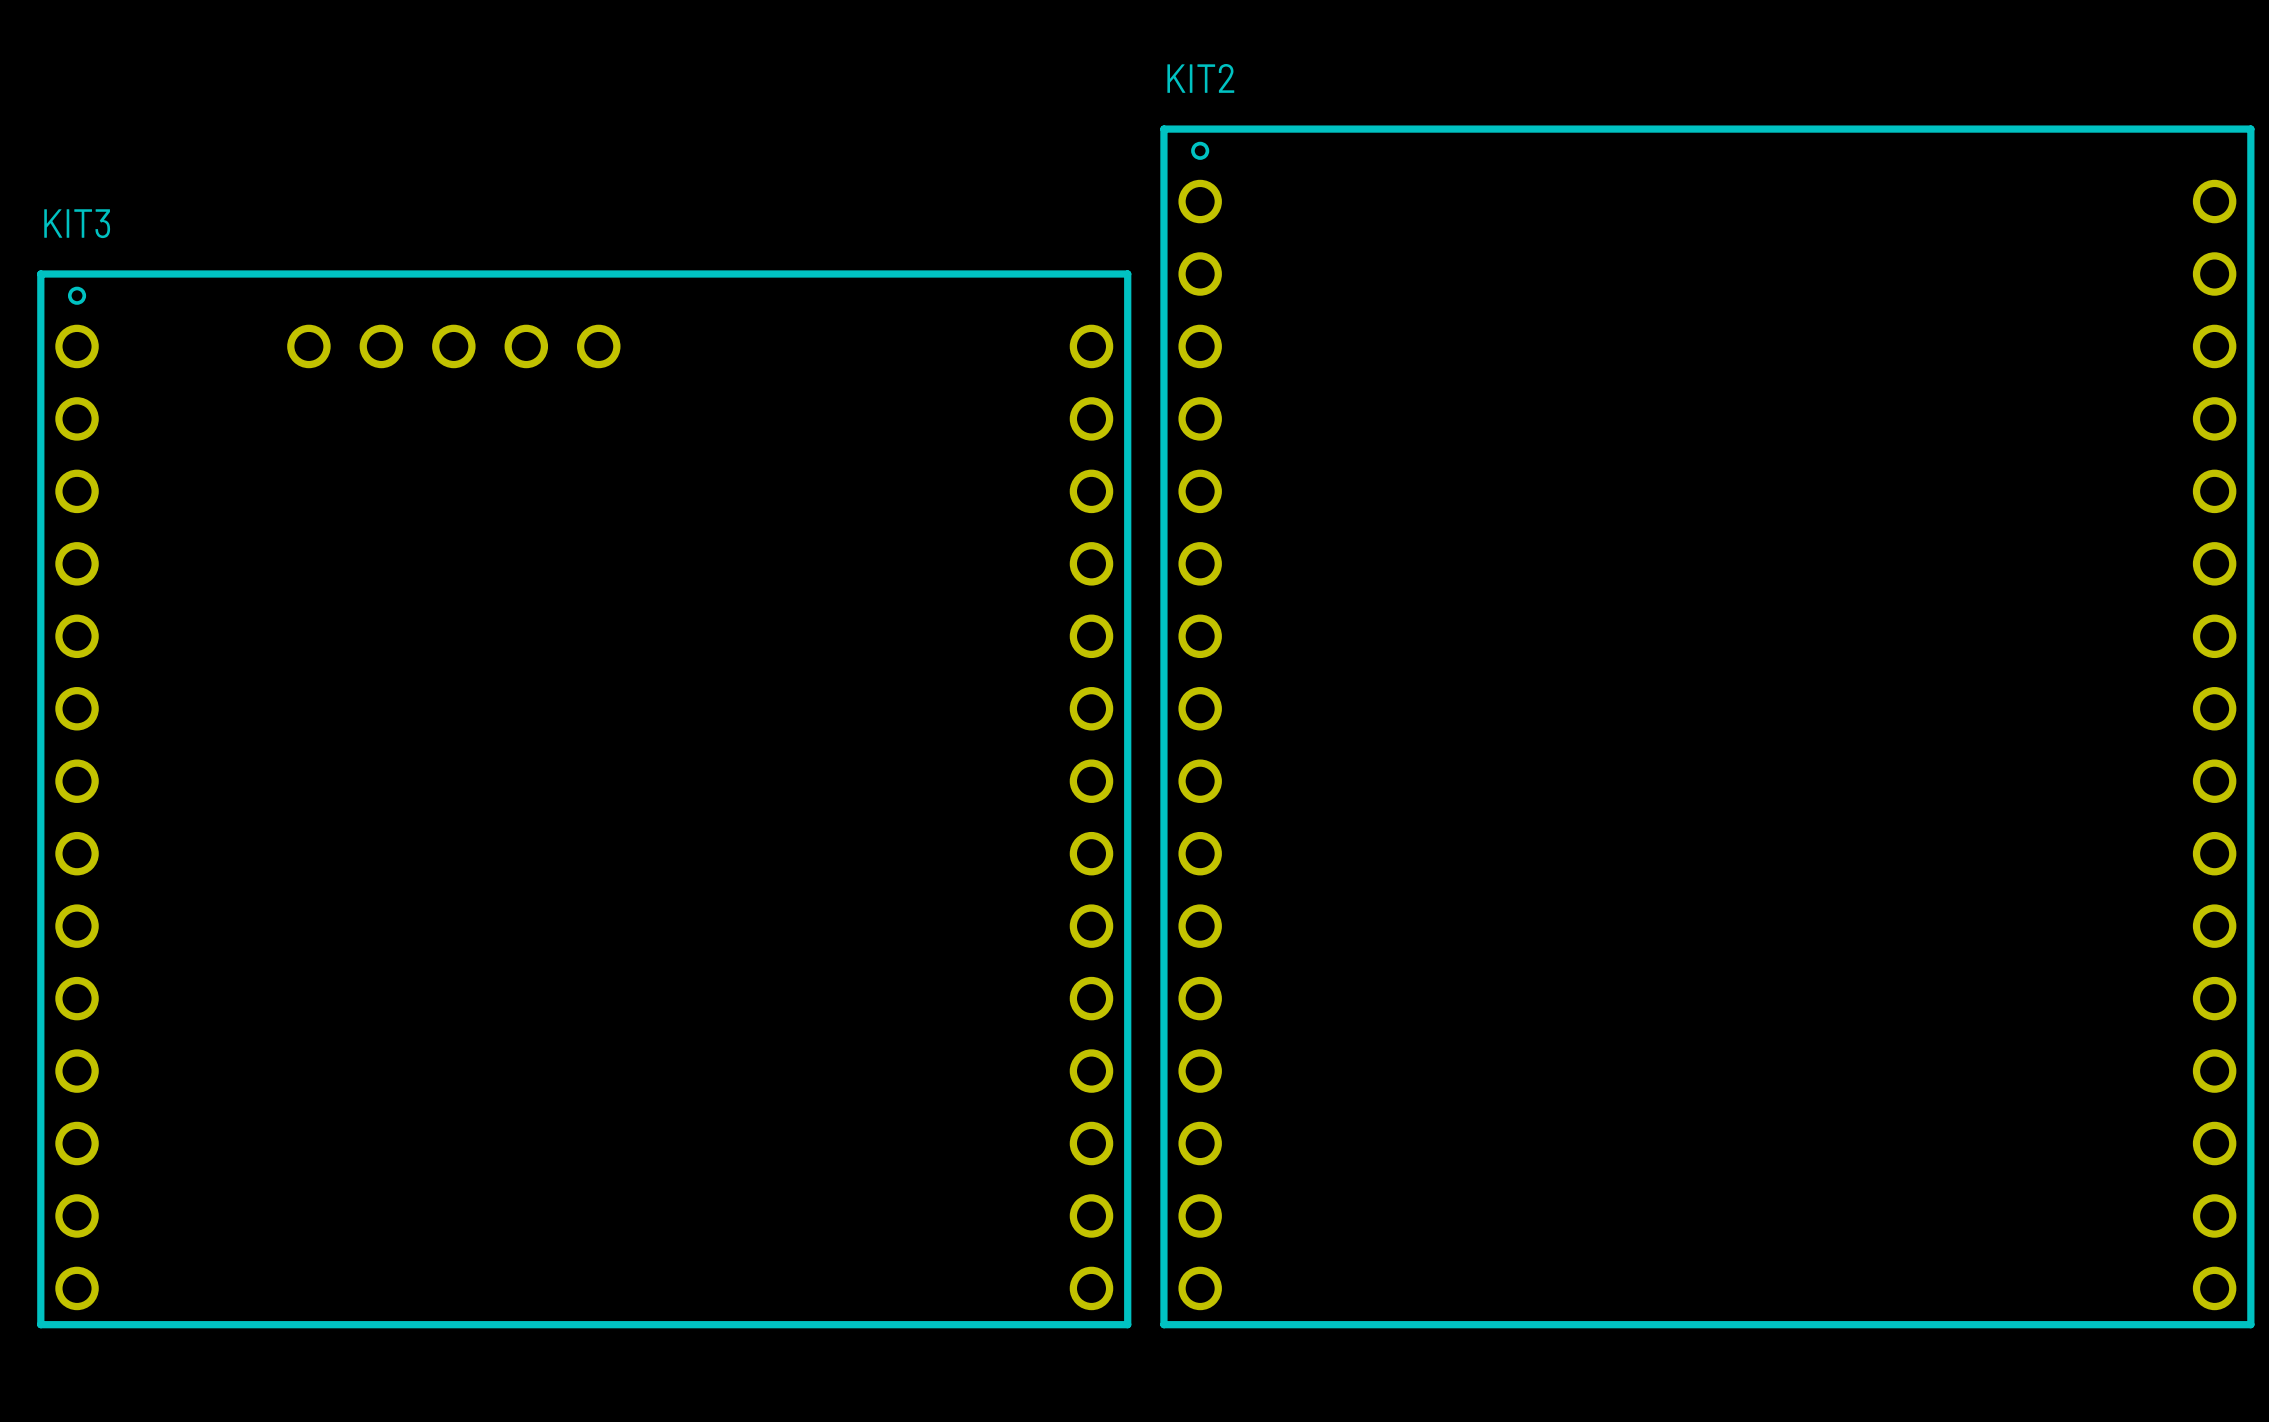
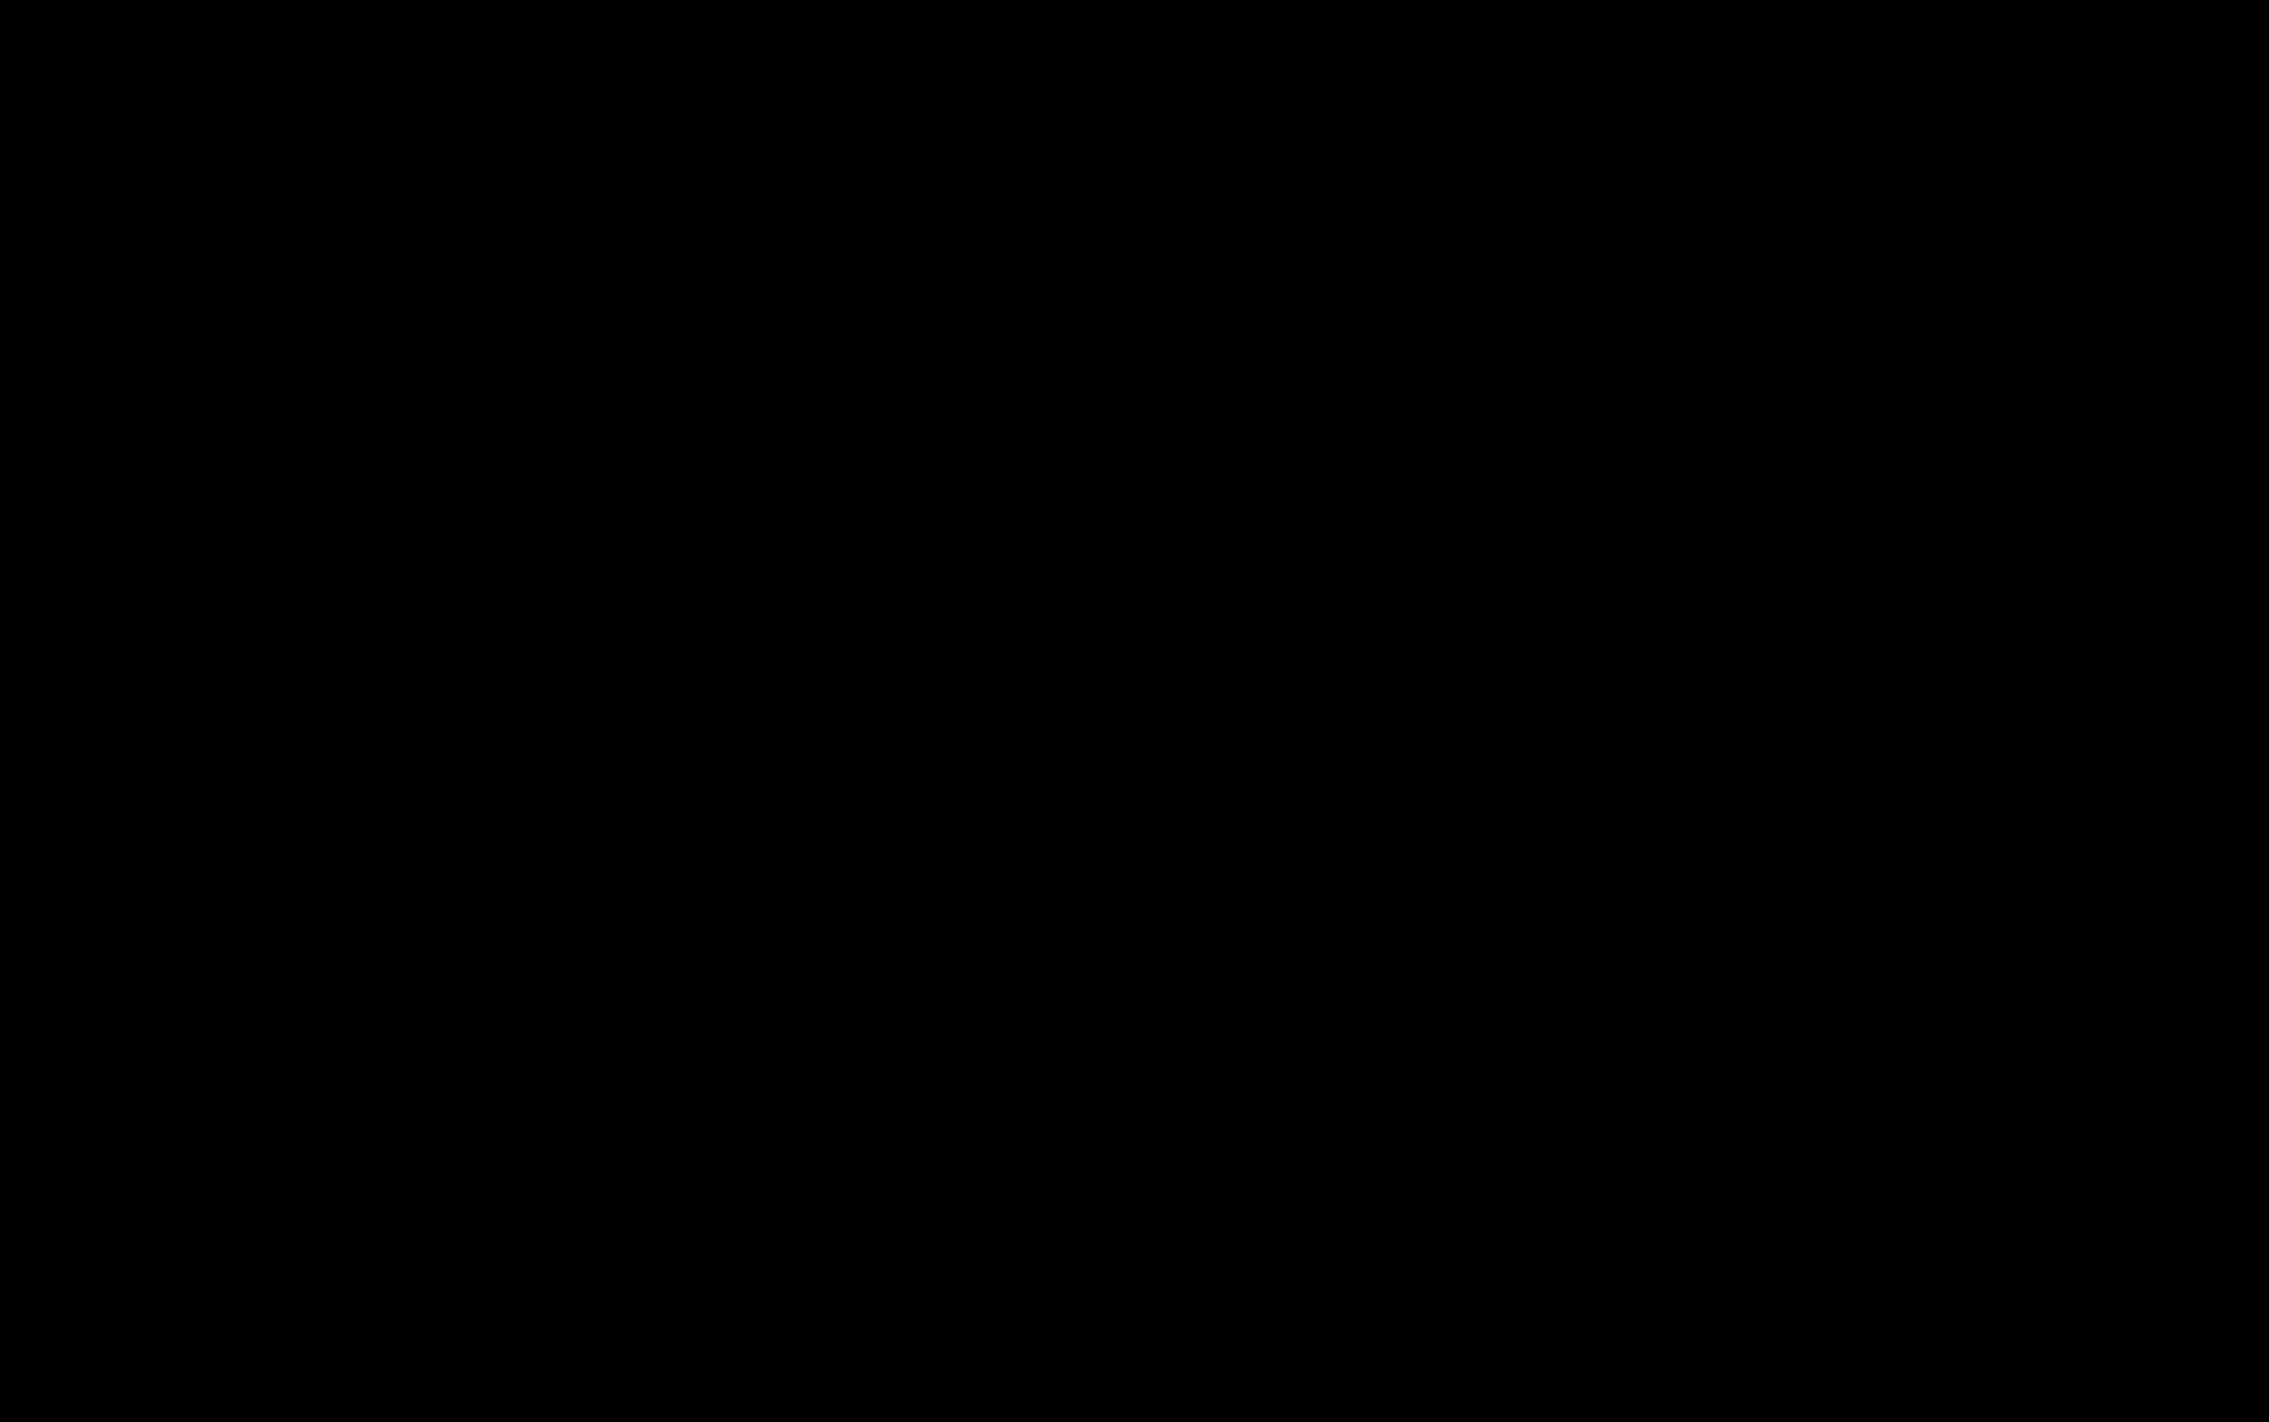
KIT2: (1707, 726) -> none
KIT3: (584, 799) -> none

